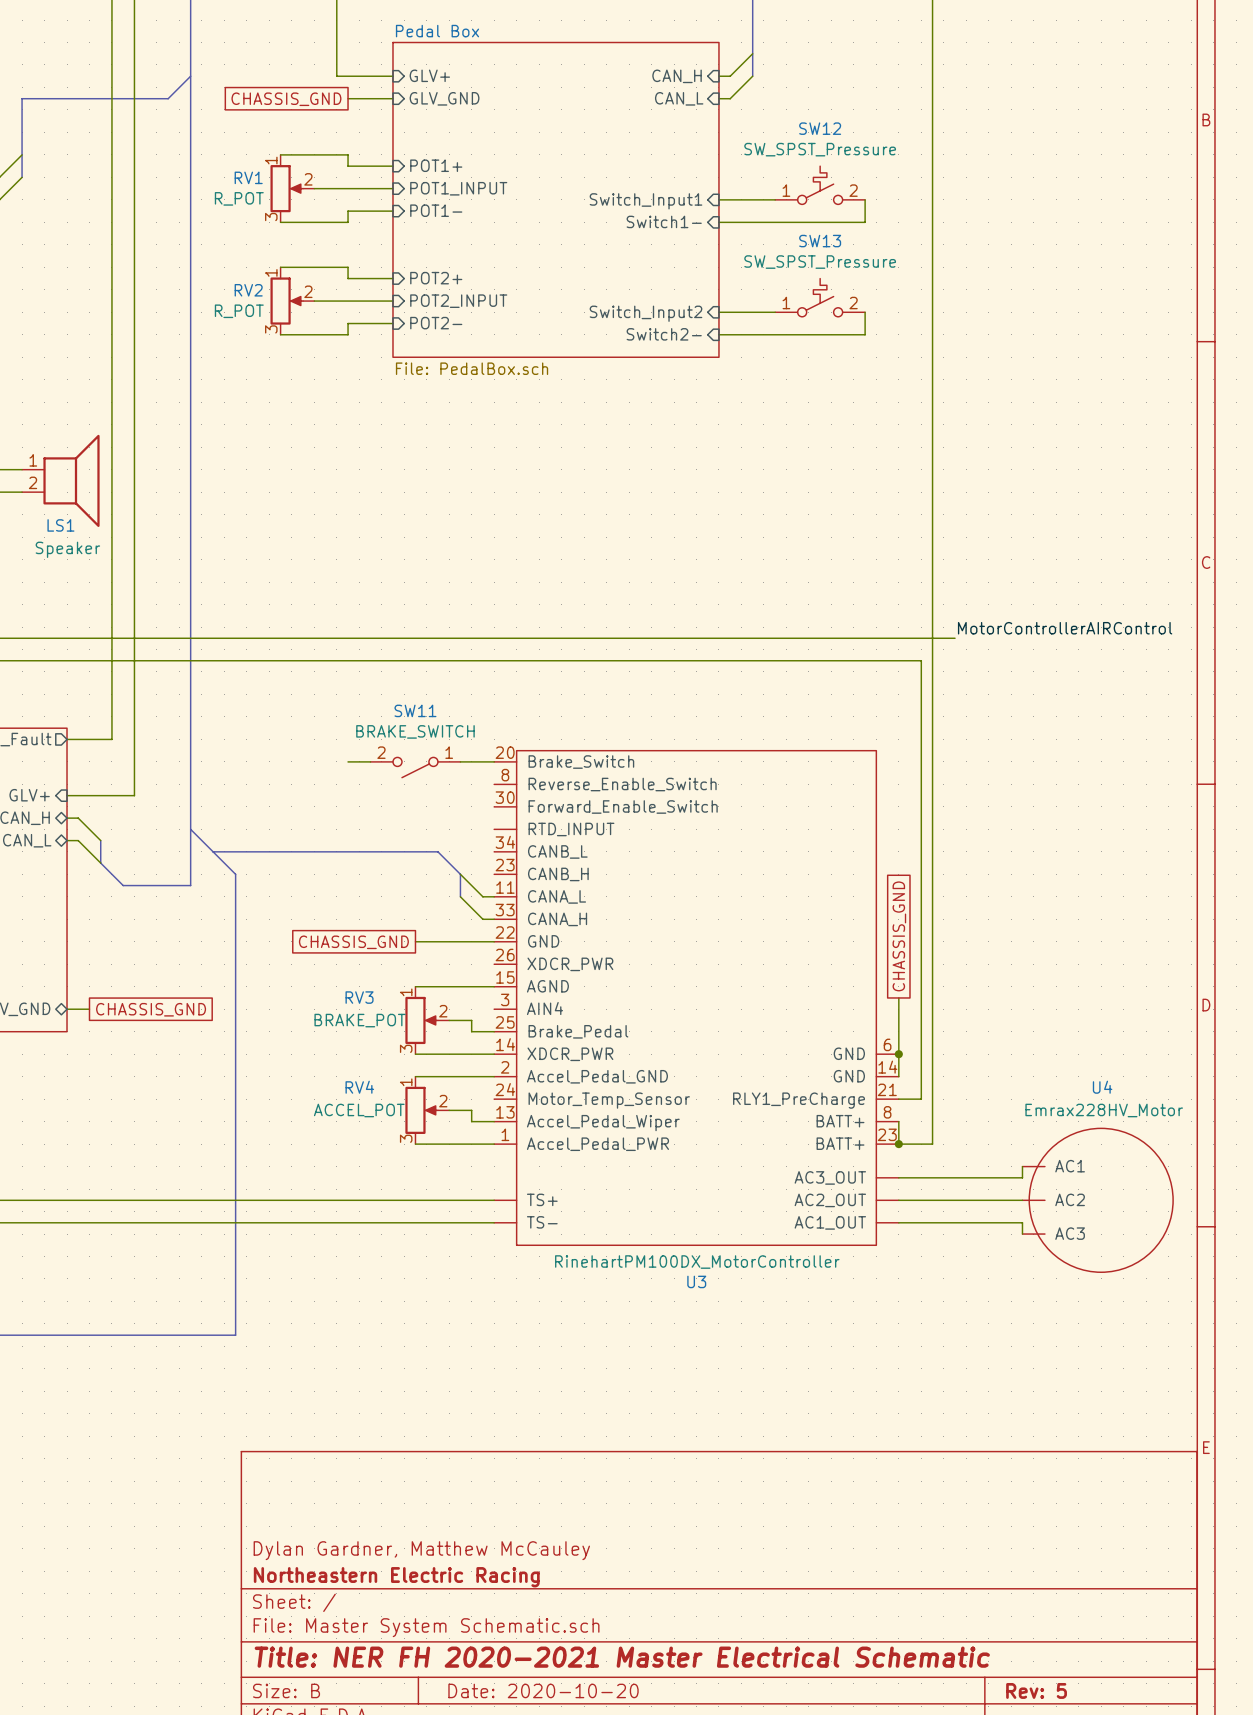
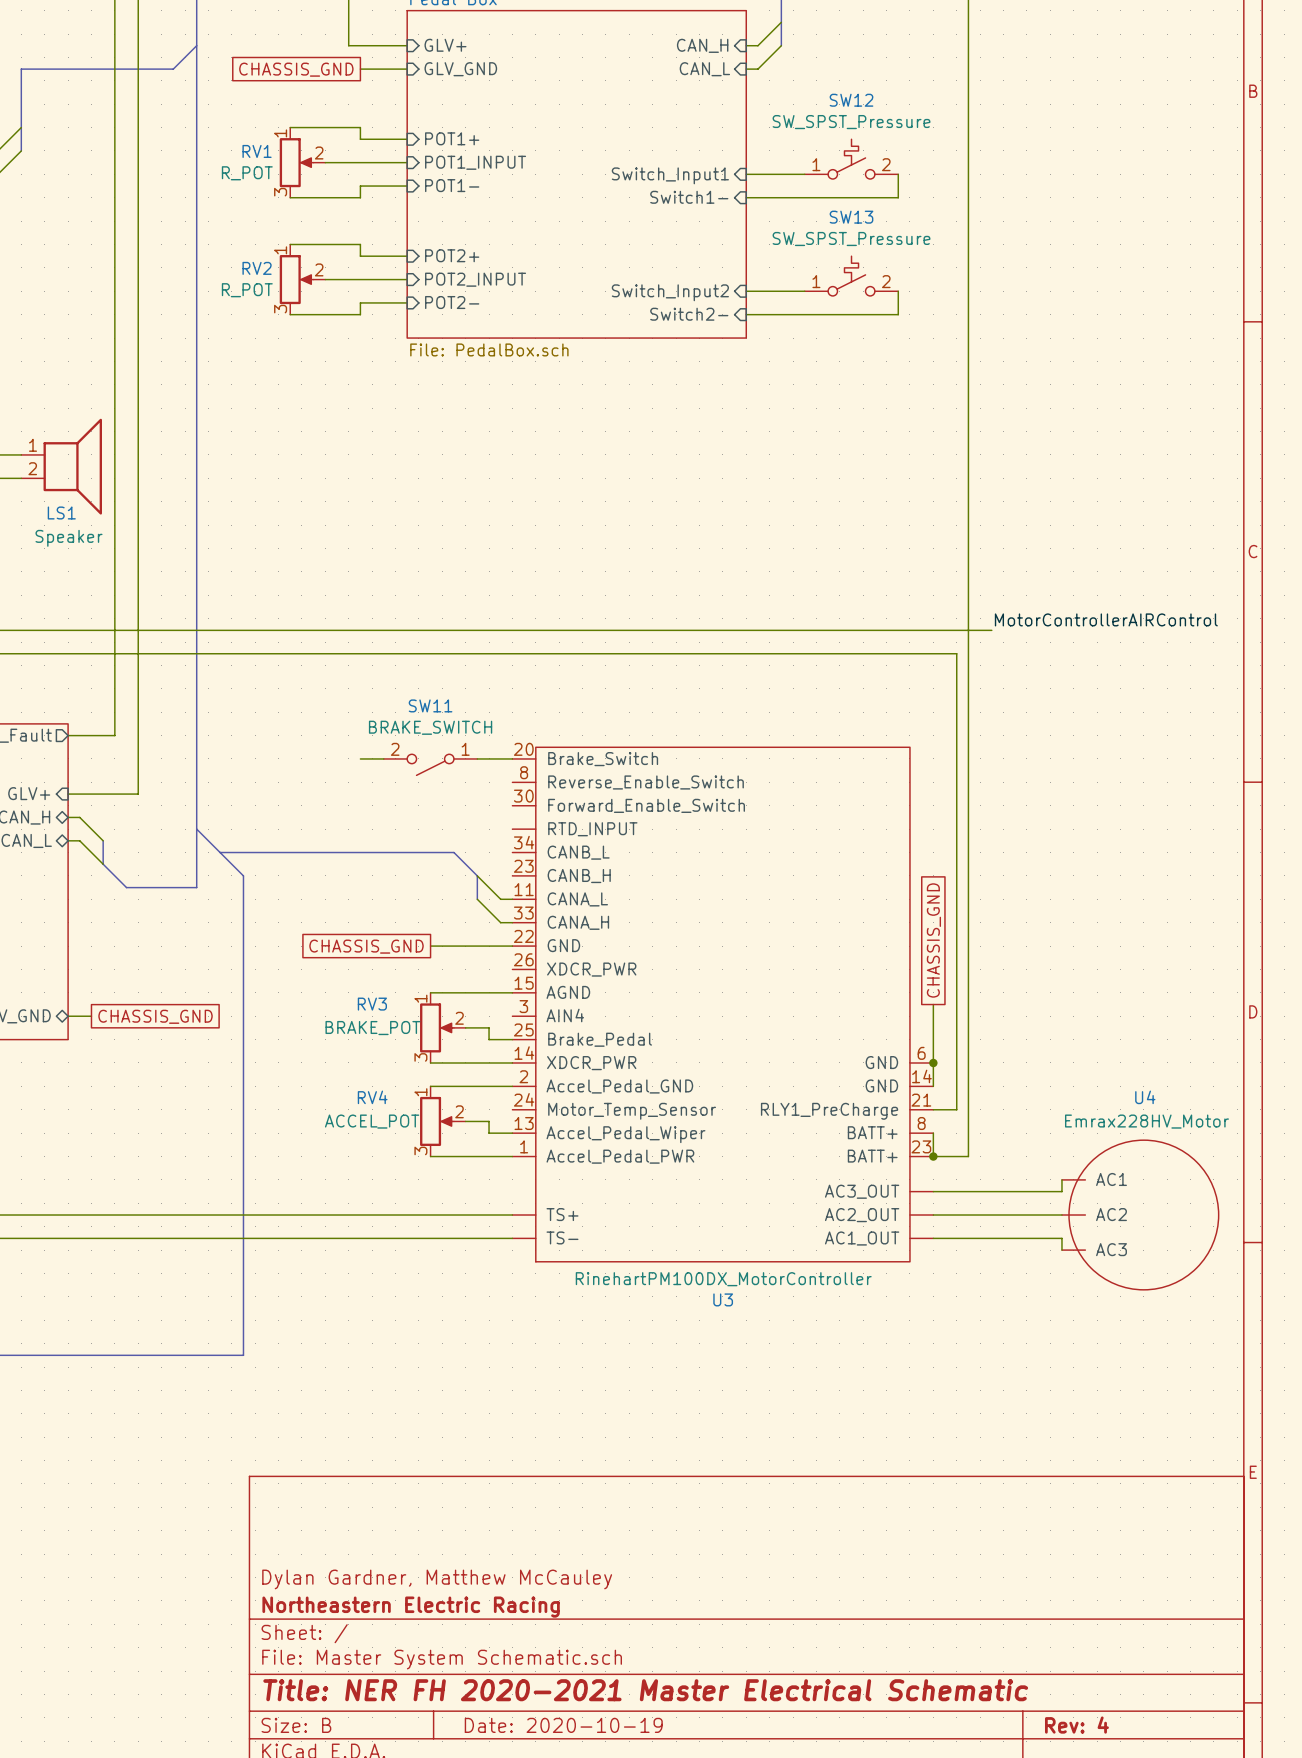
title block: Date: 2020-10-20 (543, 1690) -> Date: 2020-10-19 (563, 1725)
title block: Rev: 5 (1036, 1690) -> Rev: 4 (1076, 1725)

